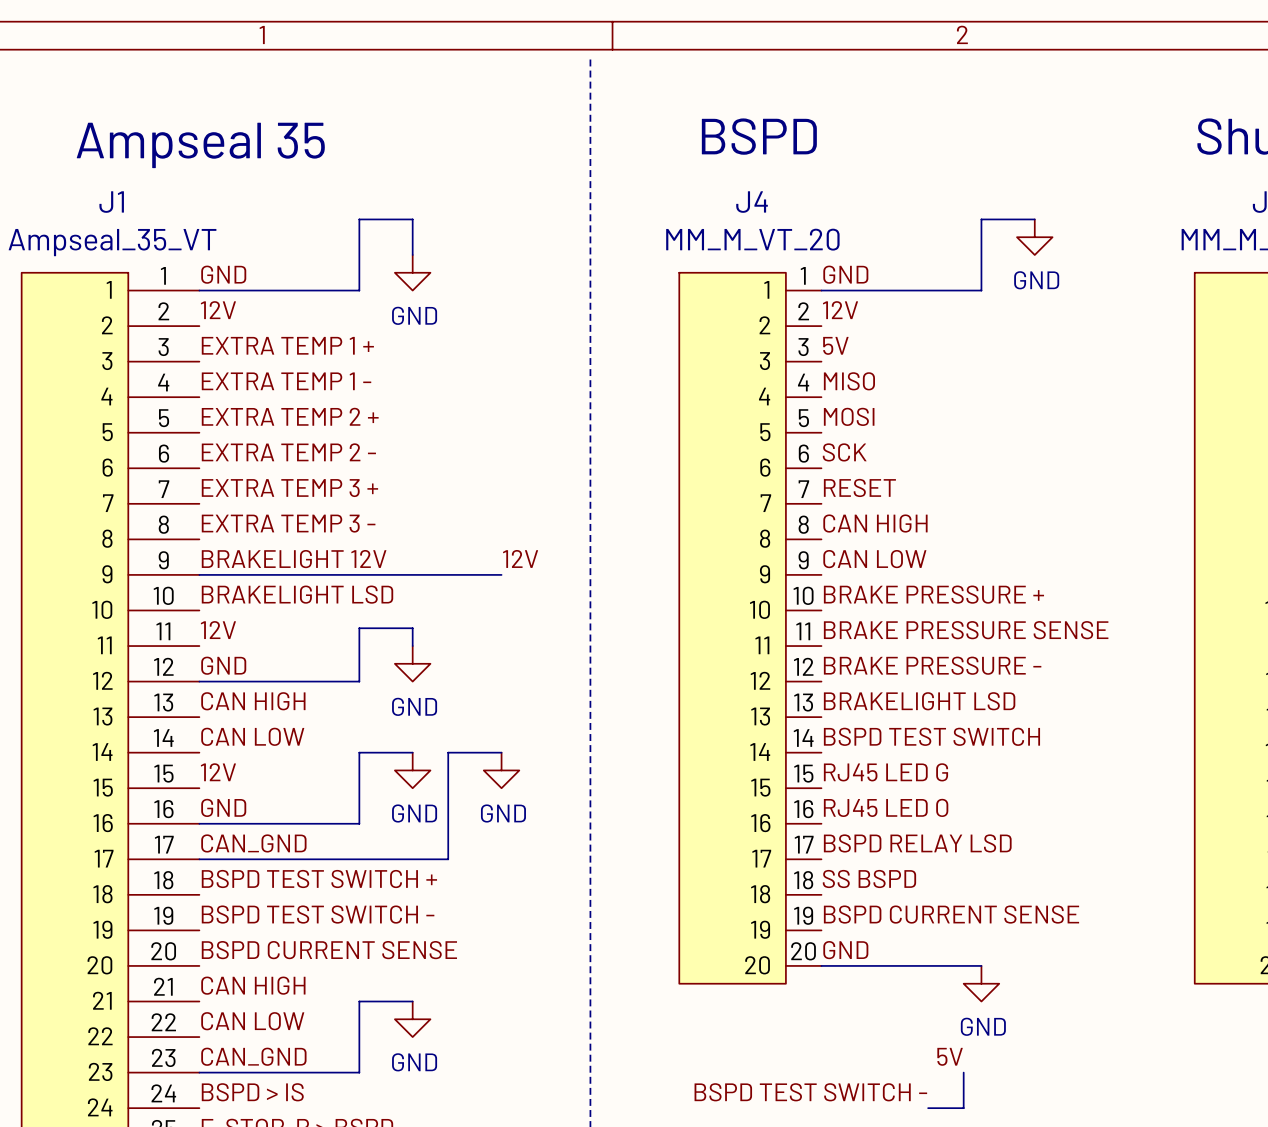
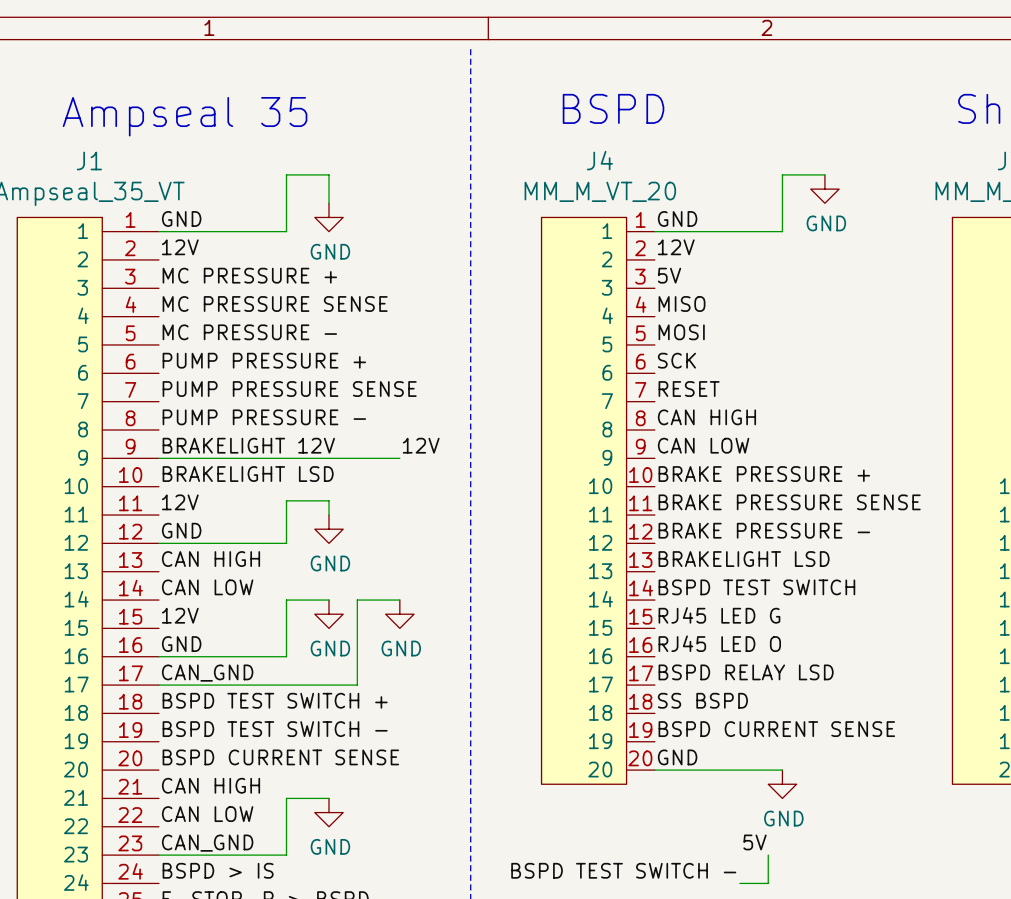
label: EXTRA TEMP 1 + (287, 345) -> MC PRESSURE + (249, 275)
label: EXTRA TEMP 1 - (286, 381) -> MC PRESSURE SENSE (275, 304)
label: EXTRA TEMP 2 + (290, 416) -> MC PRESSURE - (249, 332)
label: EXTRA TEMP 2 - (288, 452) -> PUMP PRESSURE + (264, 360)
label: EXTRA TEMP 3 + (289, 488) -> PUMP PRESSURE SENSE (289, 389)
label: EXTRA TEMP 3 - (288, 523) -> PUMP PRESSURE - (264, 417)

